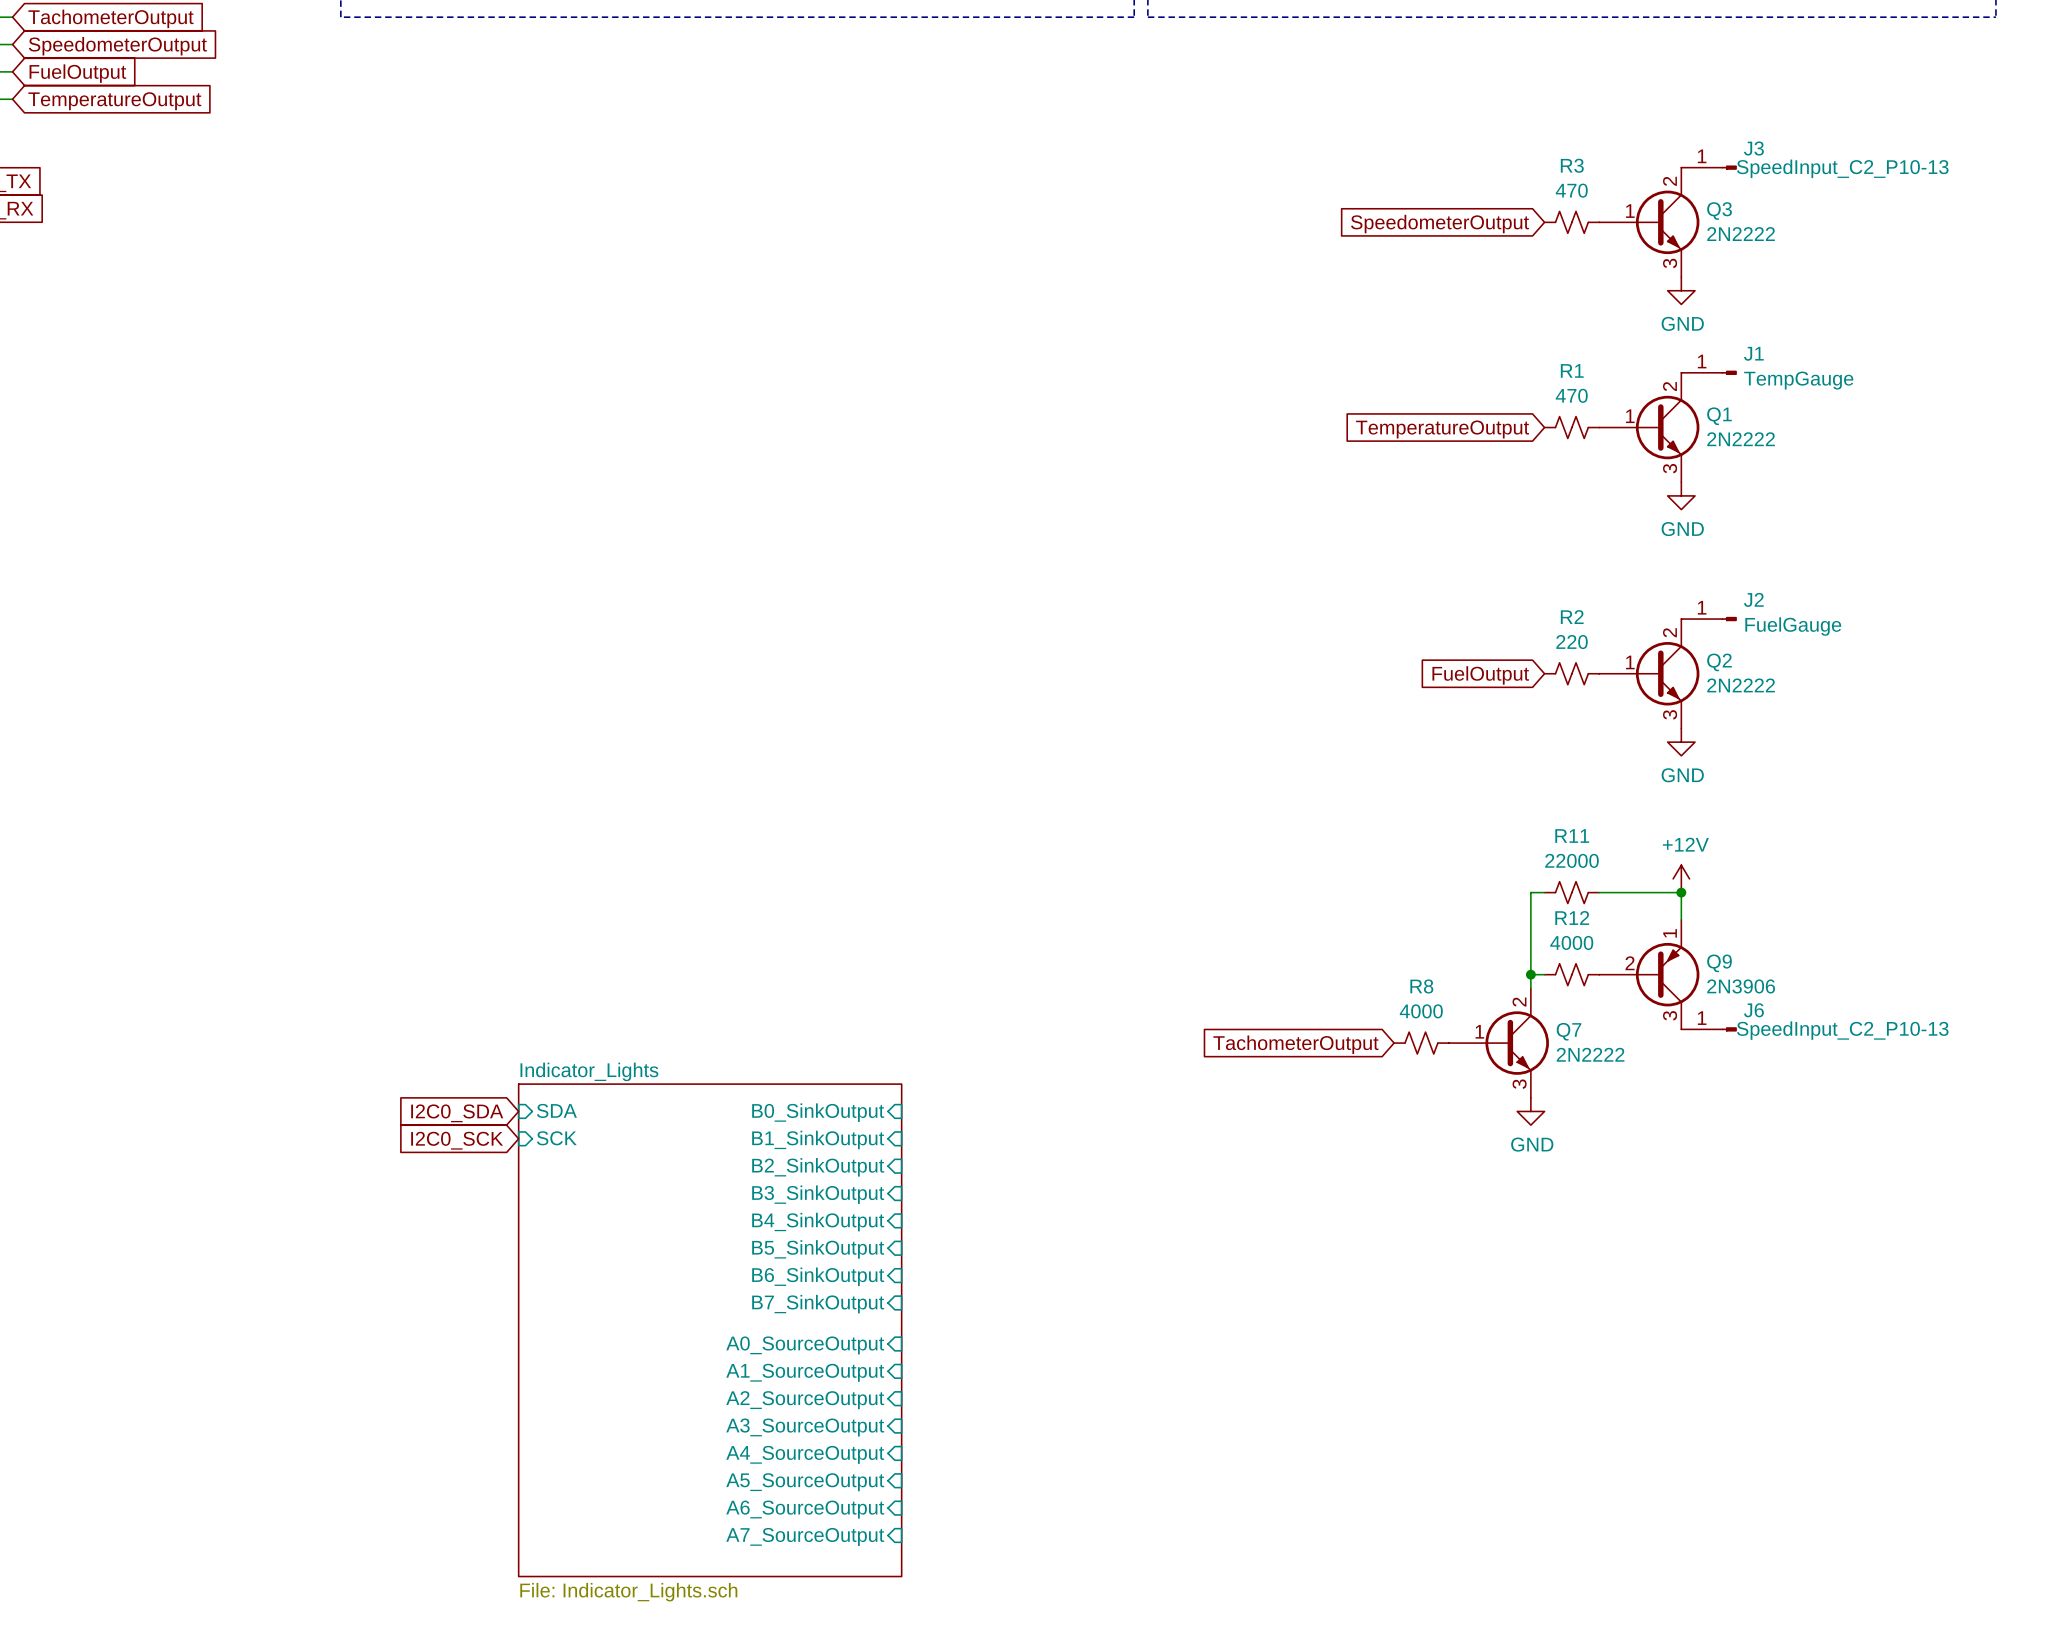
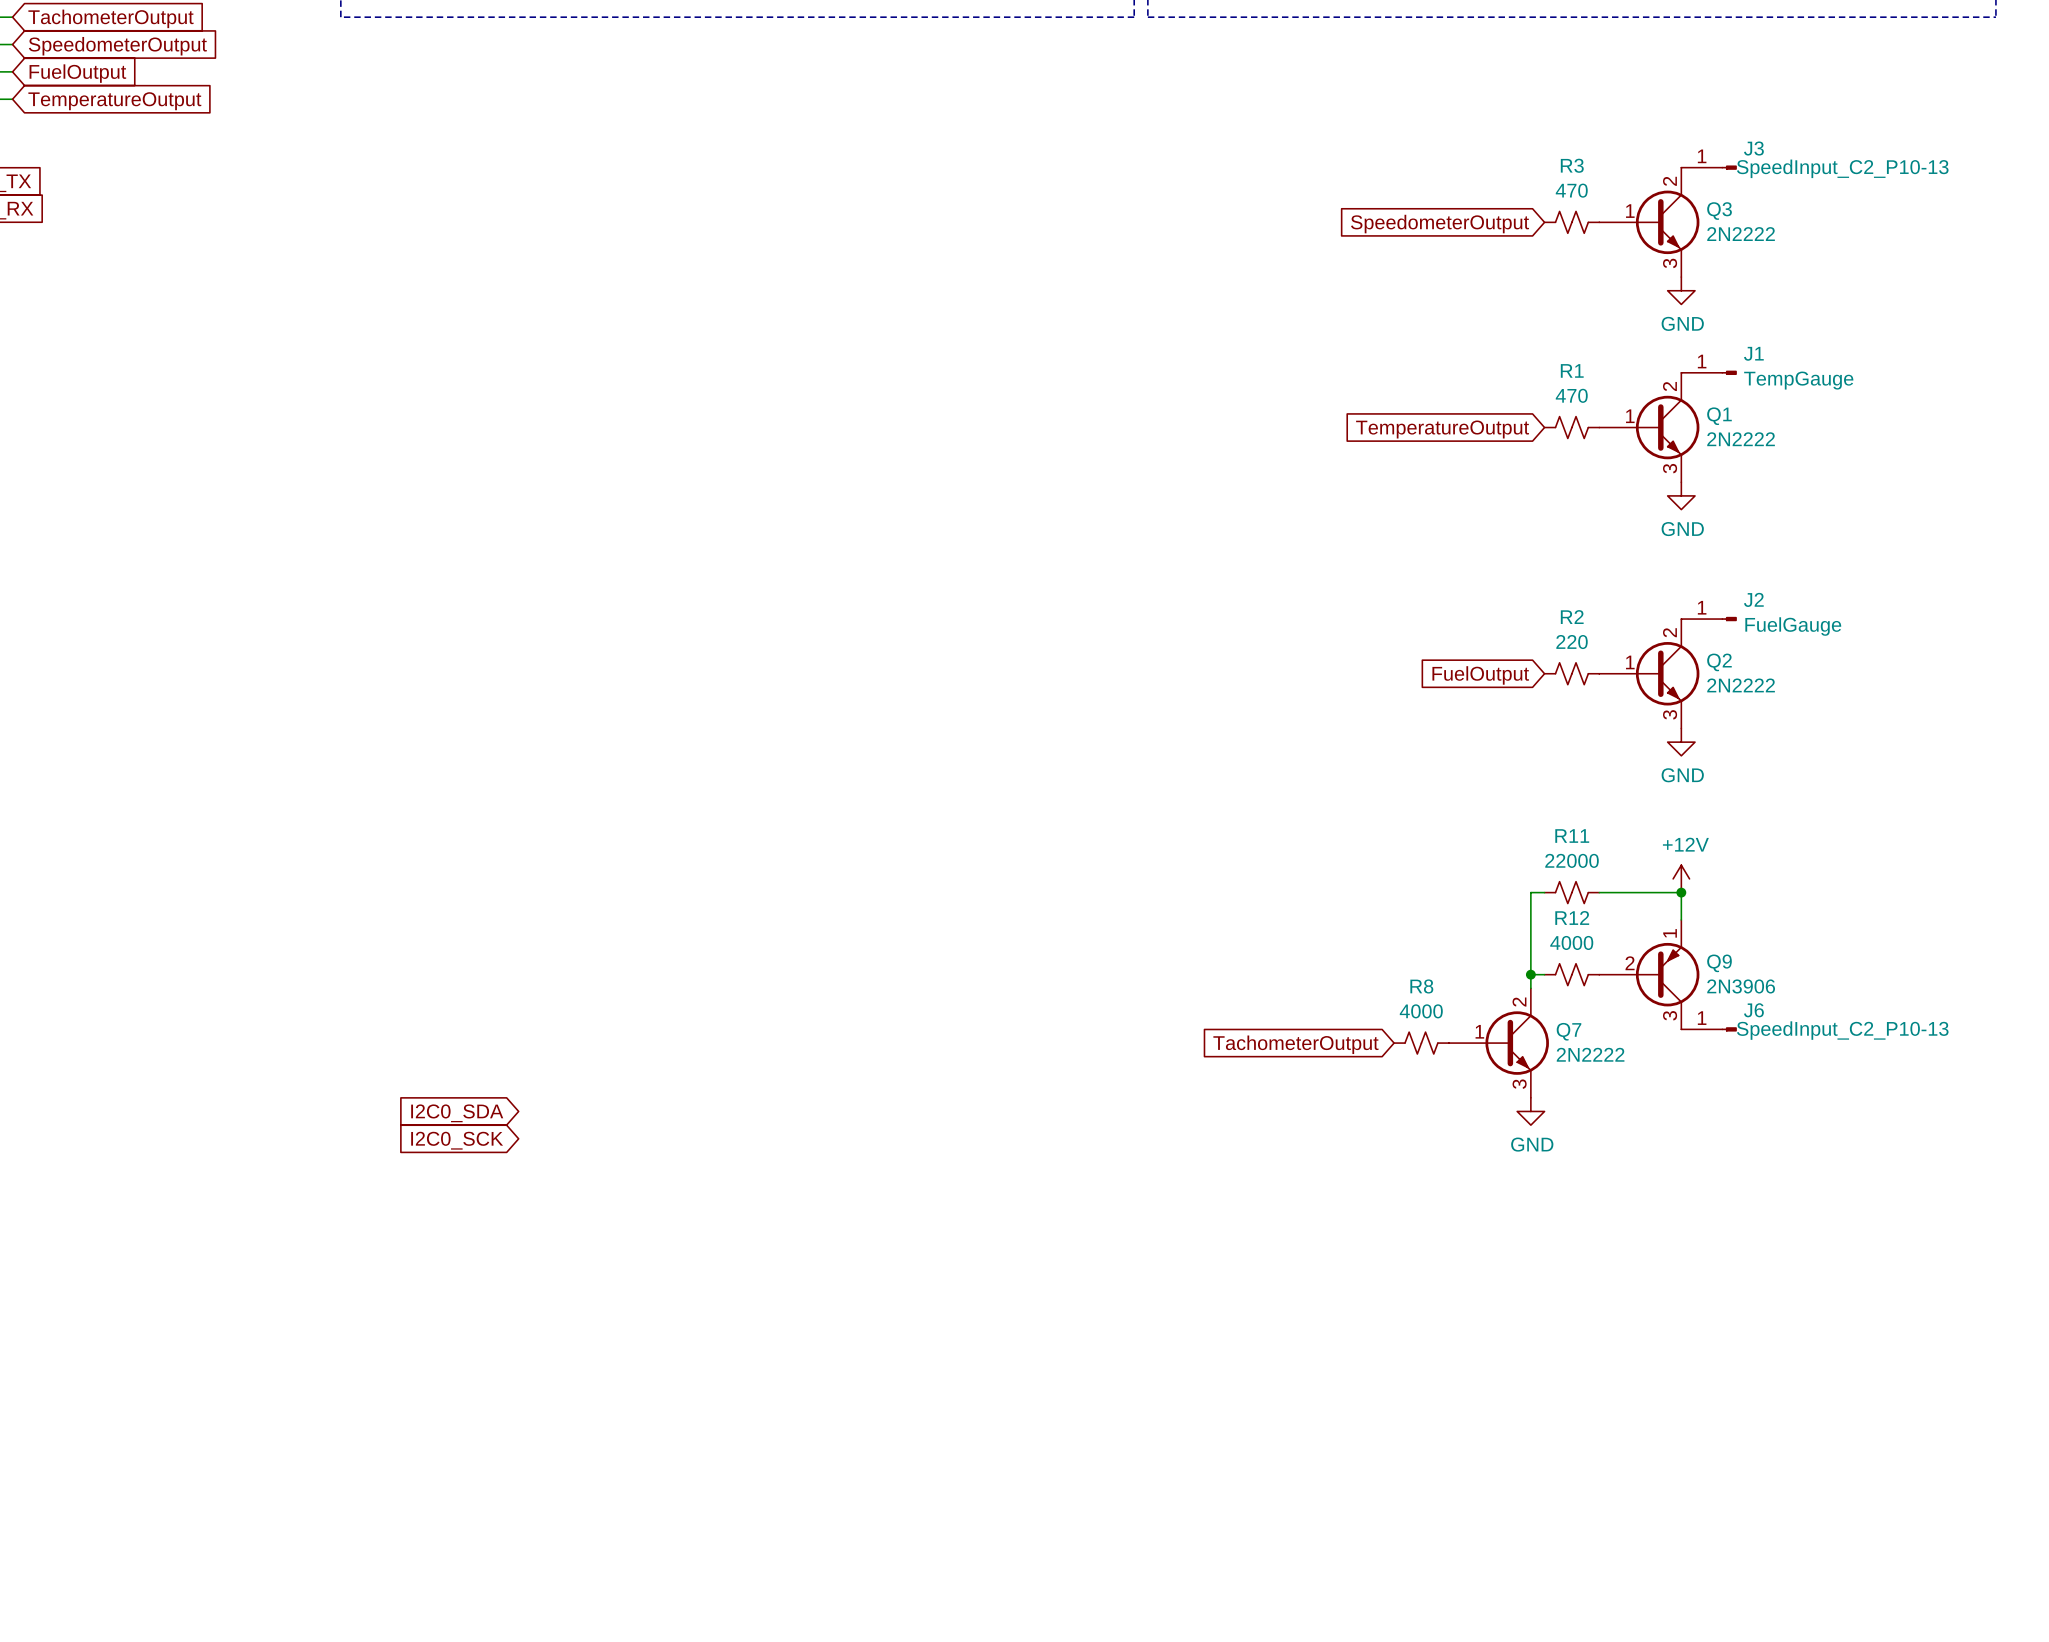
sheet pin: SDA (556, 1110) -> none
sheet pin: B0_SinkOutput (818, 1112) -> none
sheet pin: SCK (556, 1138) -> none
sheet pin: B1_SinkOutput (818, 1140) -> none
sheet pin: B2_SinkOutput (818, 1167) -> none
sheet pin: B3_SinkOutput (818, 1194) -> none
sheet pin: B4_SinkOutput (818, 1222) -> none
sheet pin: B5_SinkOutput (818, 1249) -> none
sheet pin: B6_SinkOutput (818, 1276) -> none
sheet pin: B7_SinkOutput (818, 1304) -> none
sheet Indicator_Lights: File: Indicator_Lights.sch (710, 1330) -> none
sheet pin: A0_SourceOutput (805, 1345) -> none
sheet pin: A1_SourceOutput (805, 1372) -> none
sheet pin: A2_SourceOutput (805, 1400) -> none
sheet pin: A3_SourceOutput (805, 1427) -> none
sheet pin: A4_SourceOutput (805, 1454) -> none
sheet pin: A5_SourceOutput (805, 1482) -> none
sheet pin: A6_SourceOutput (805, 1509) -> none
sheet pin: A7_SourceOutput (805, 1536) -> none

